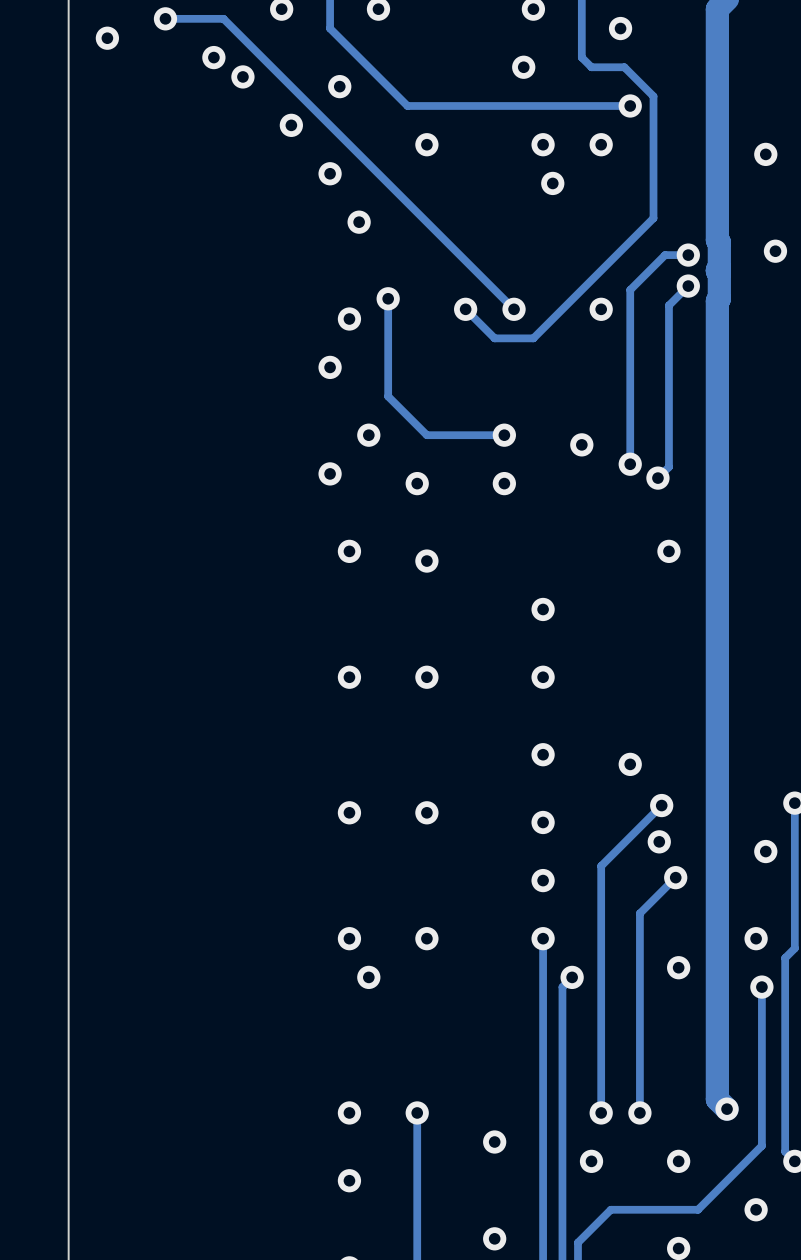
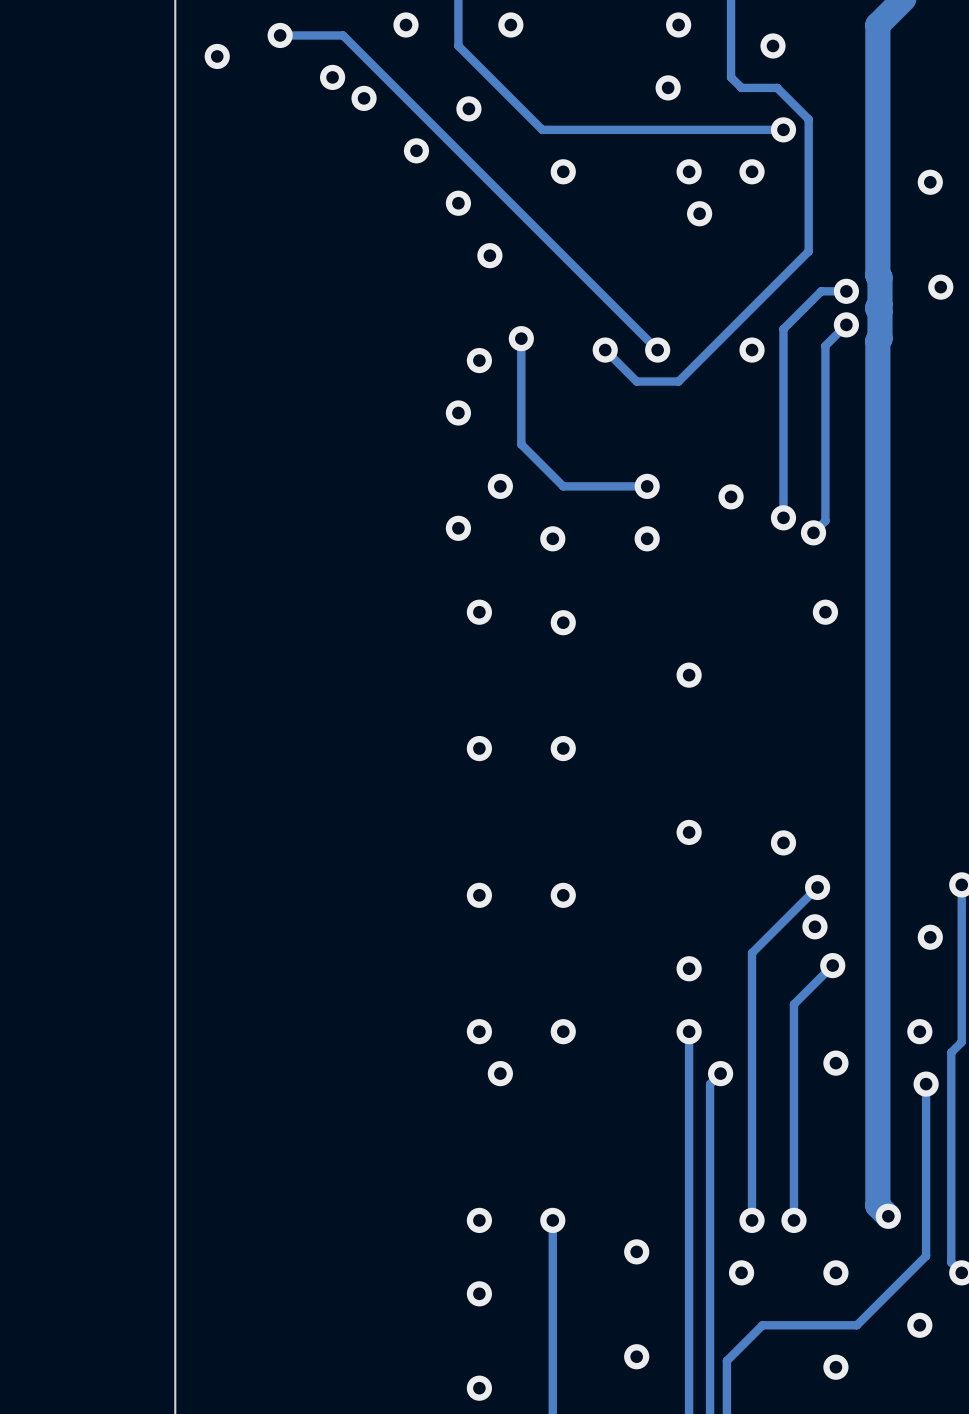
via: (543, 677) -> none
via: (543, 822) -> none

